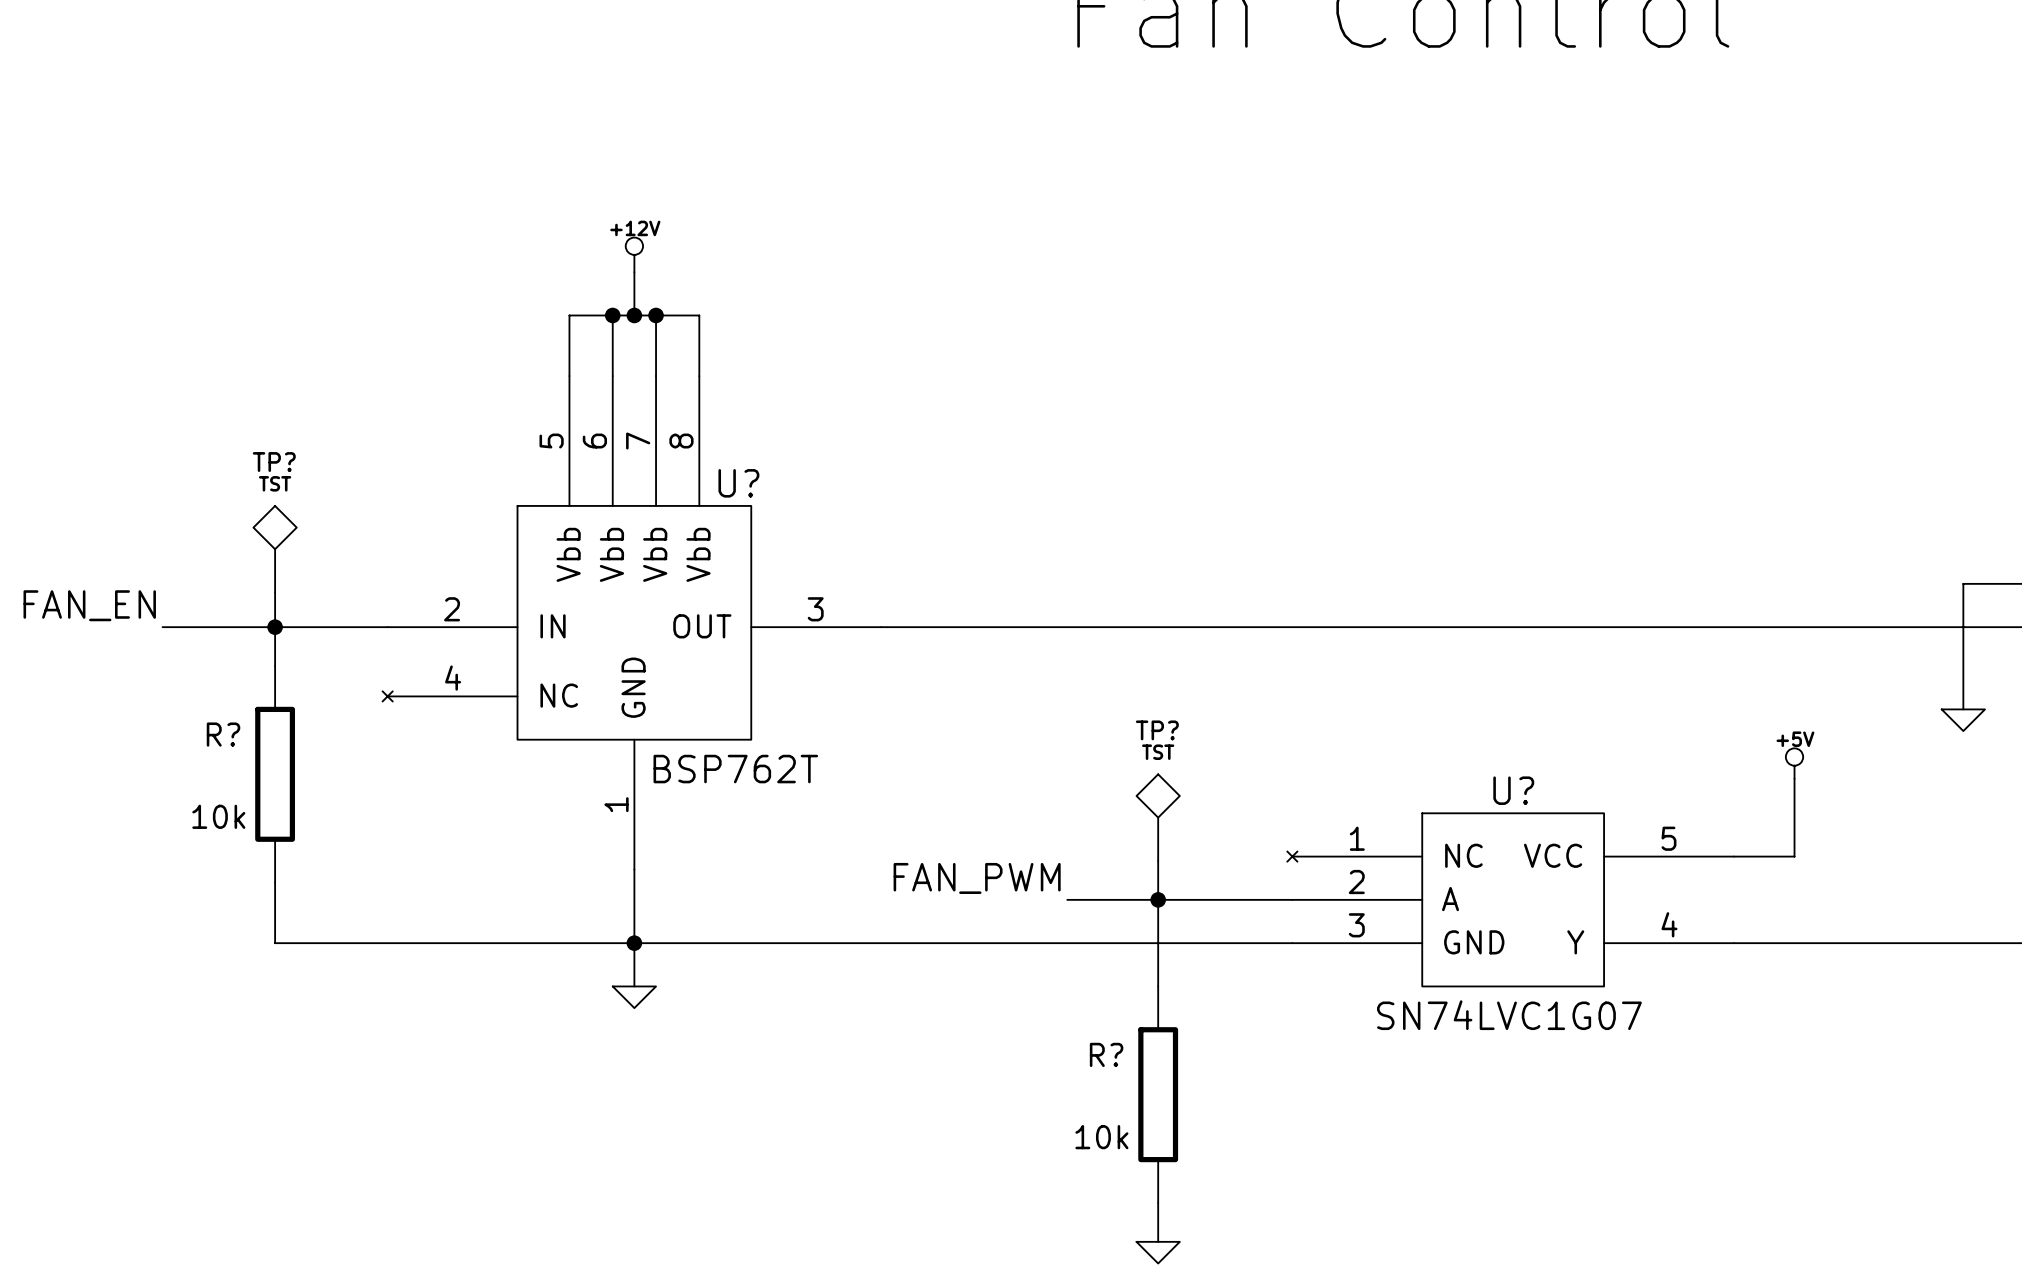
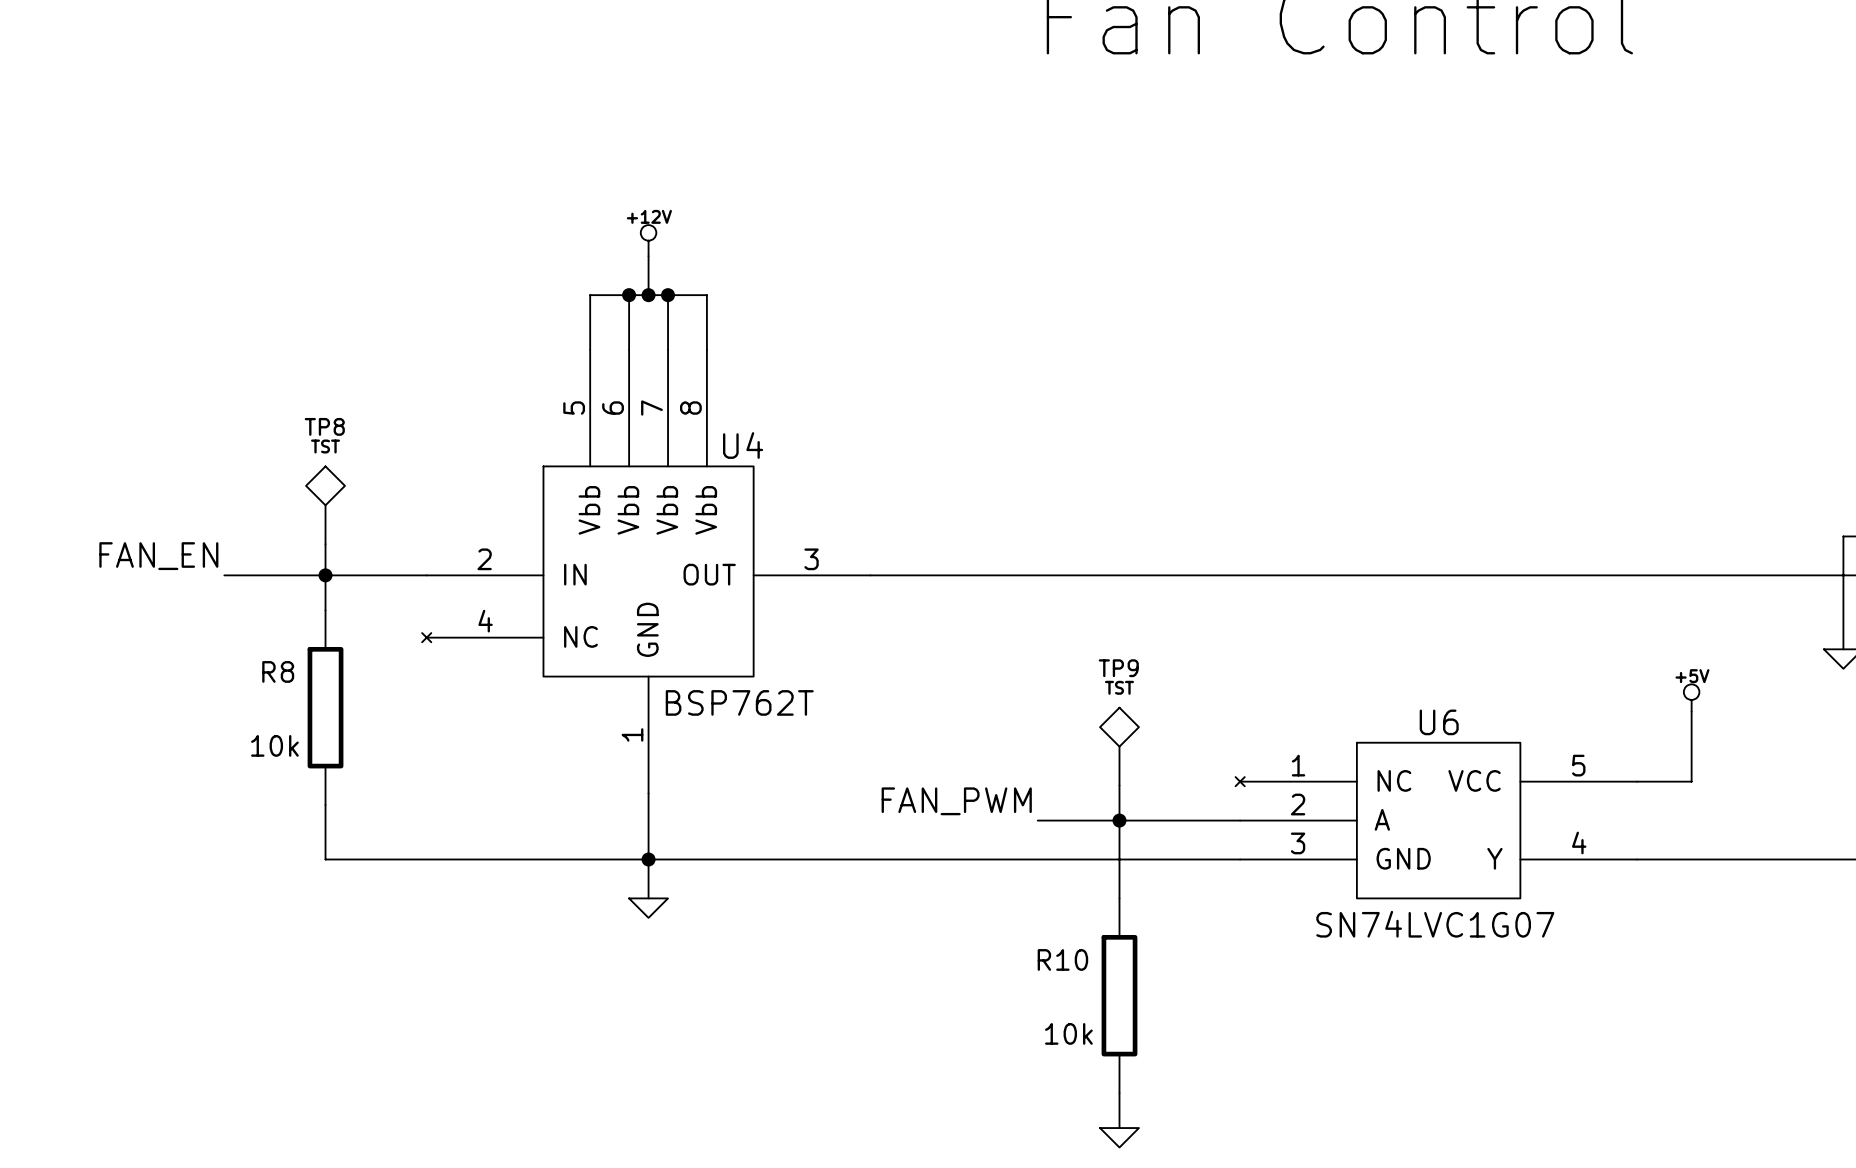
TP? name: TP? (274, 462) -> TP8 (324, 426)
U? name: U? (738, 483) -> U4 (743, 445)
TP? name: TP? (1157, 730) -> TP9 (1118, 668)
R? name: R? (223, 734) -> R8 (278, 671)
U? name: U? (1513, 790) -> U6 (1439, 722)
R? name: R? (1106, 1054) -> R10 (1062, 959)

